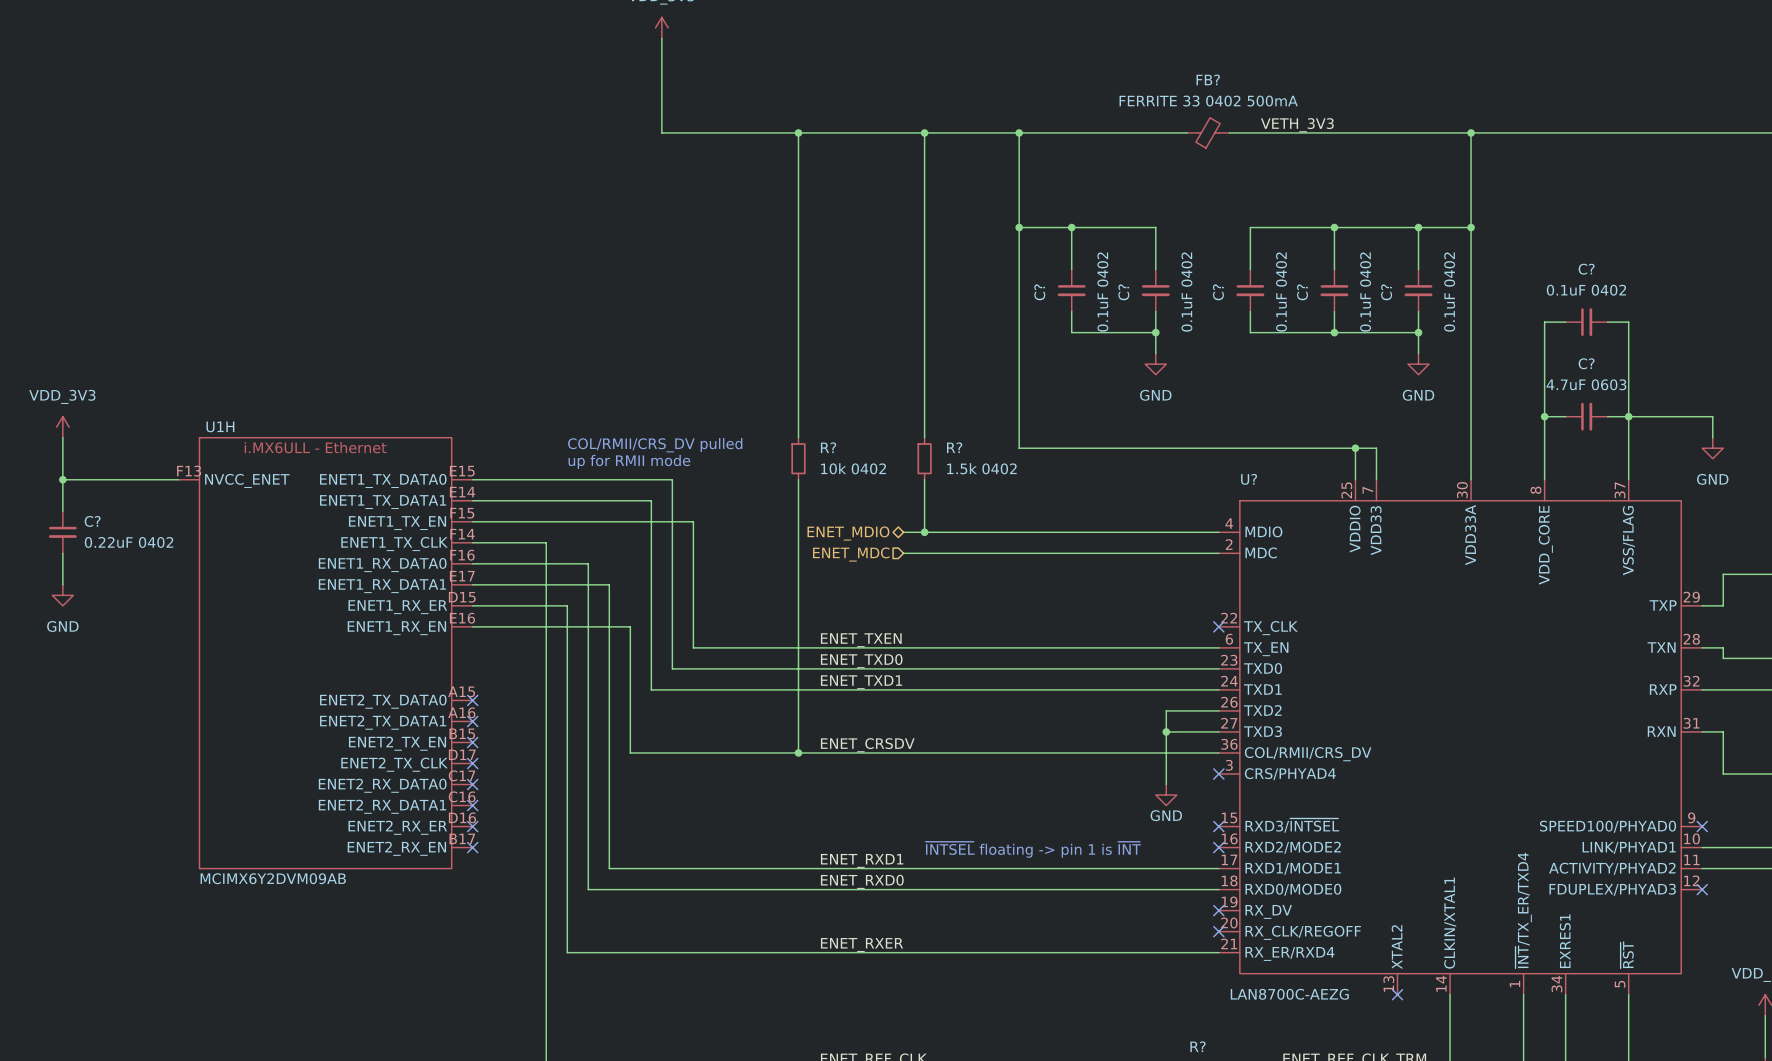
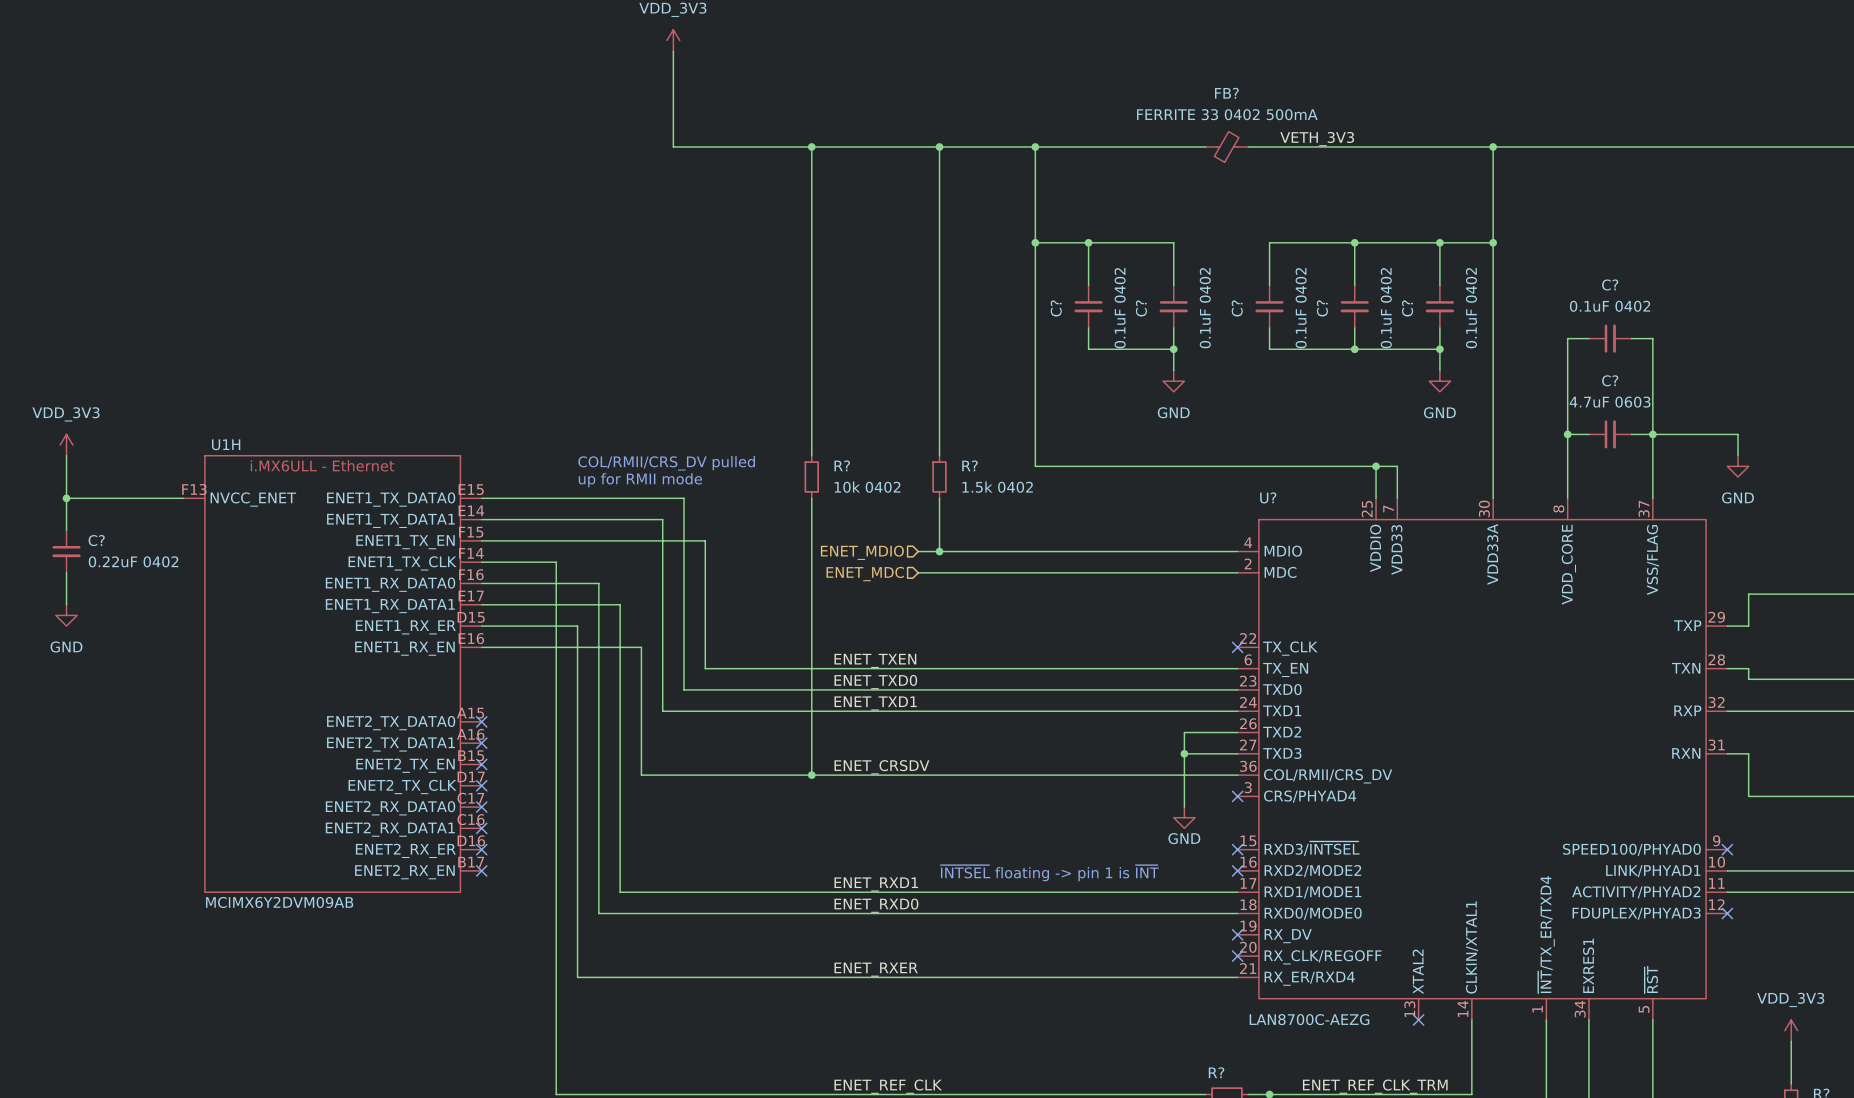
hierarchical label shape: bidirectional (848, 533) -> input (862, 552)

